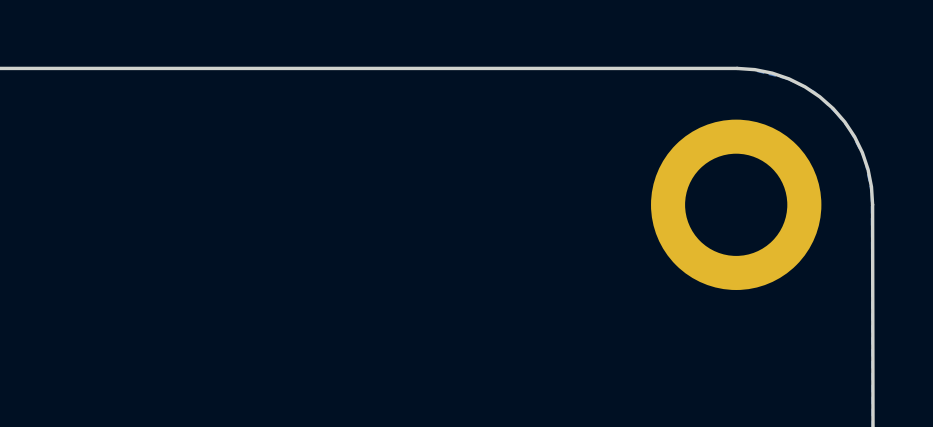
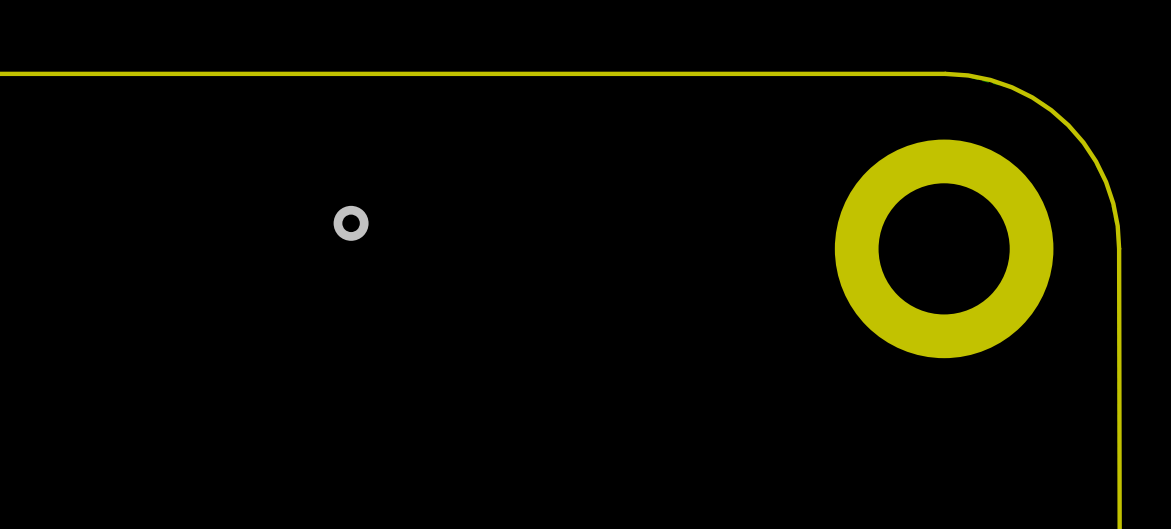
via: none -> (351, 223)

